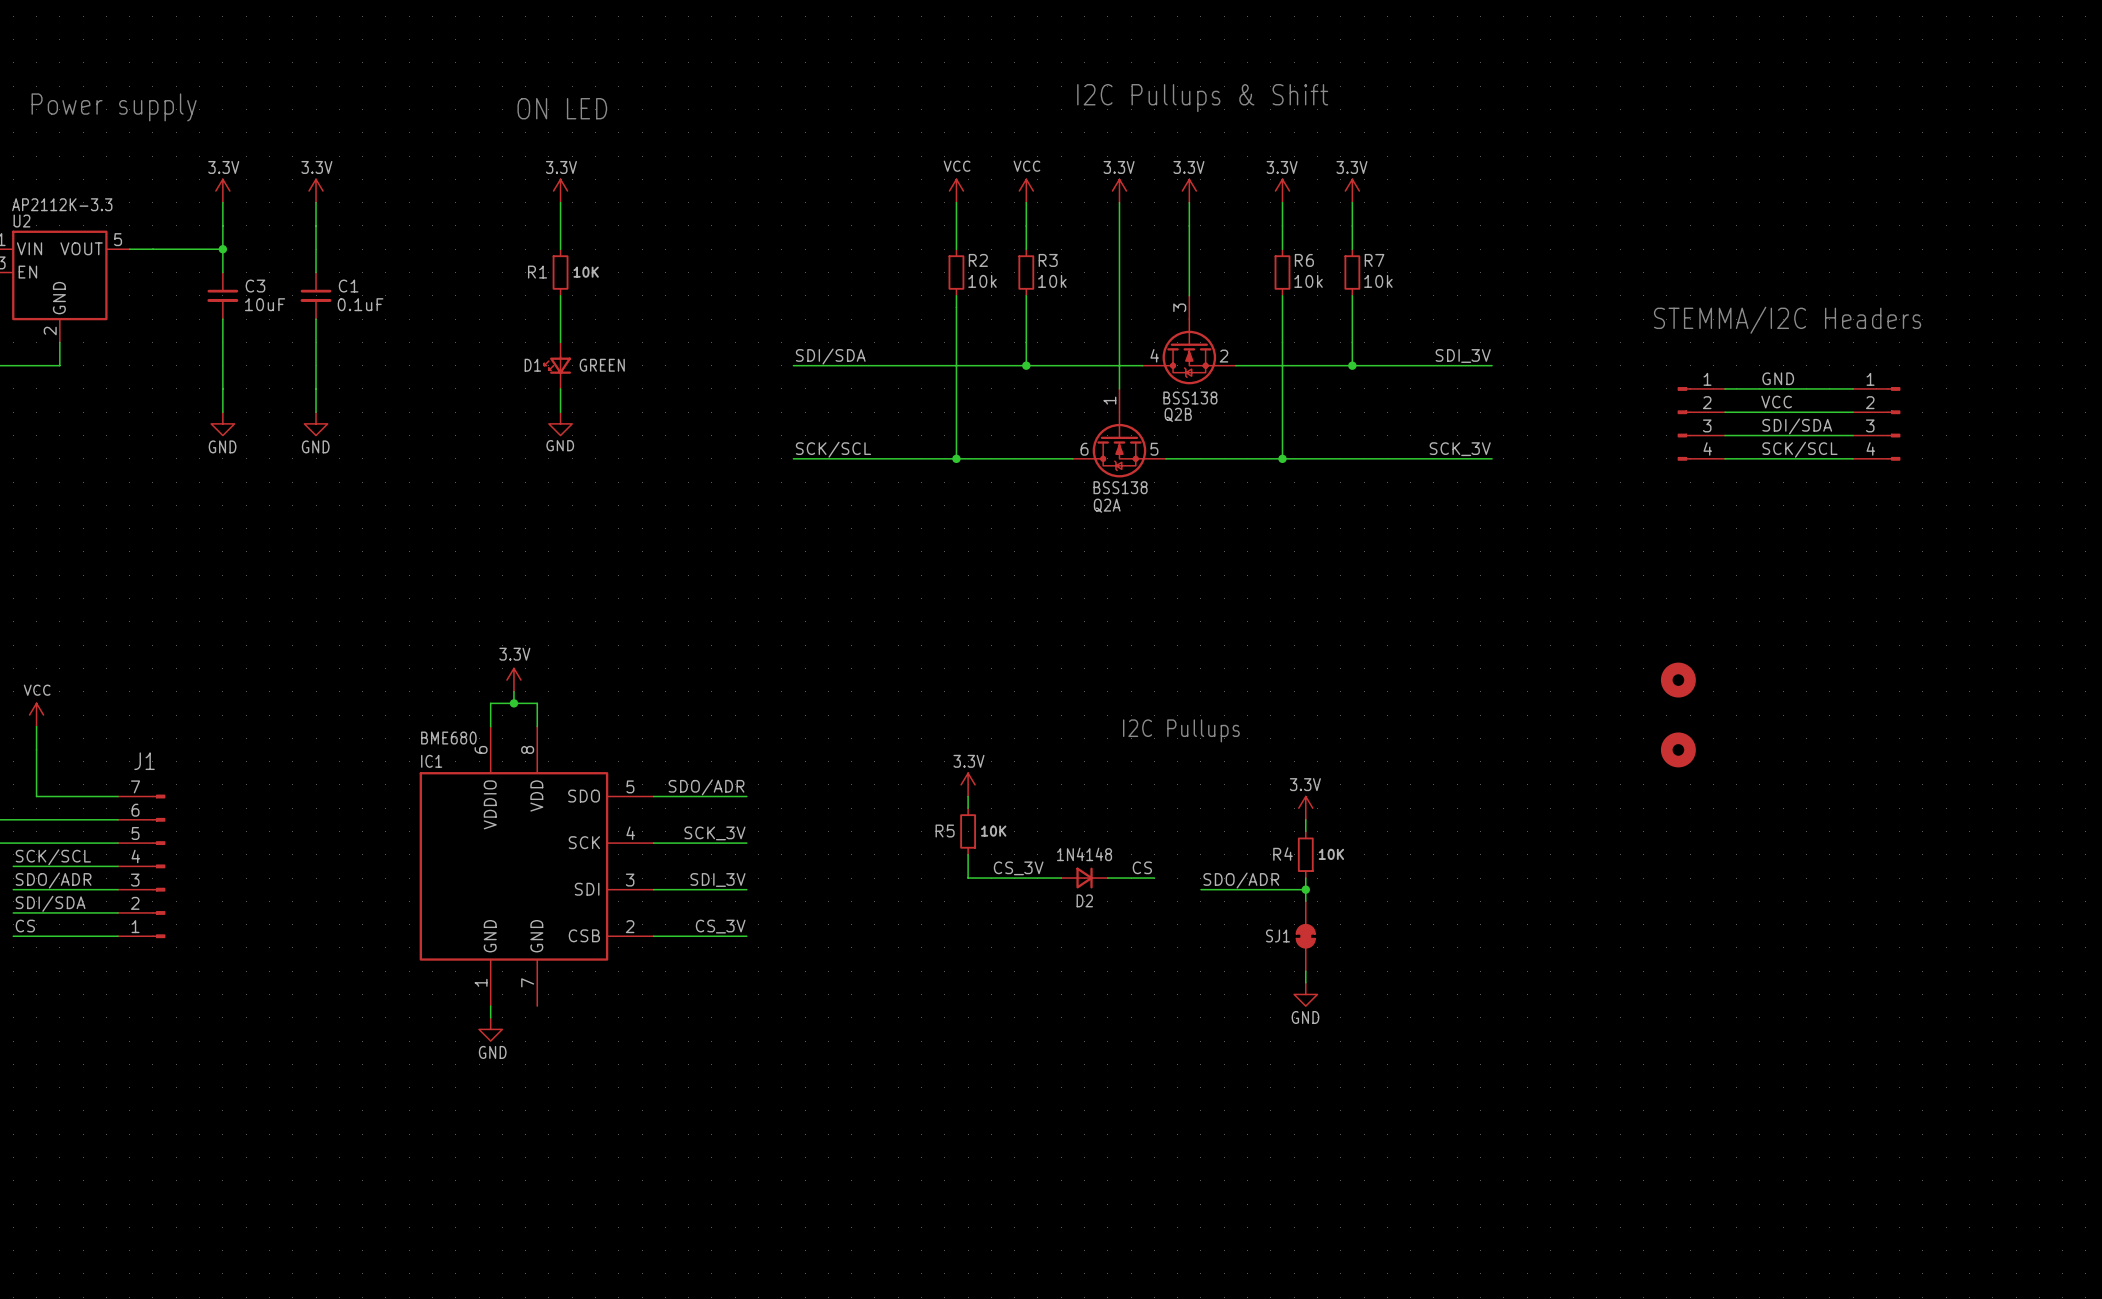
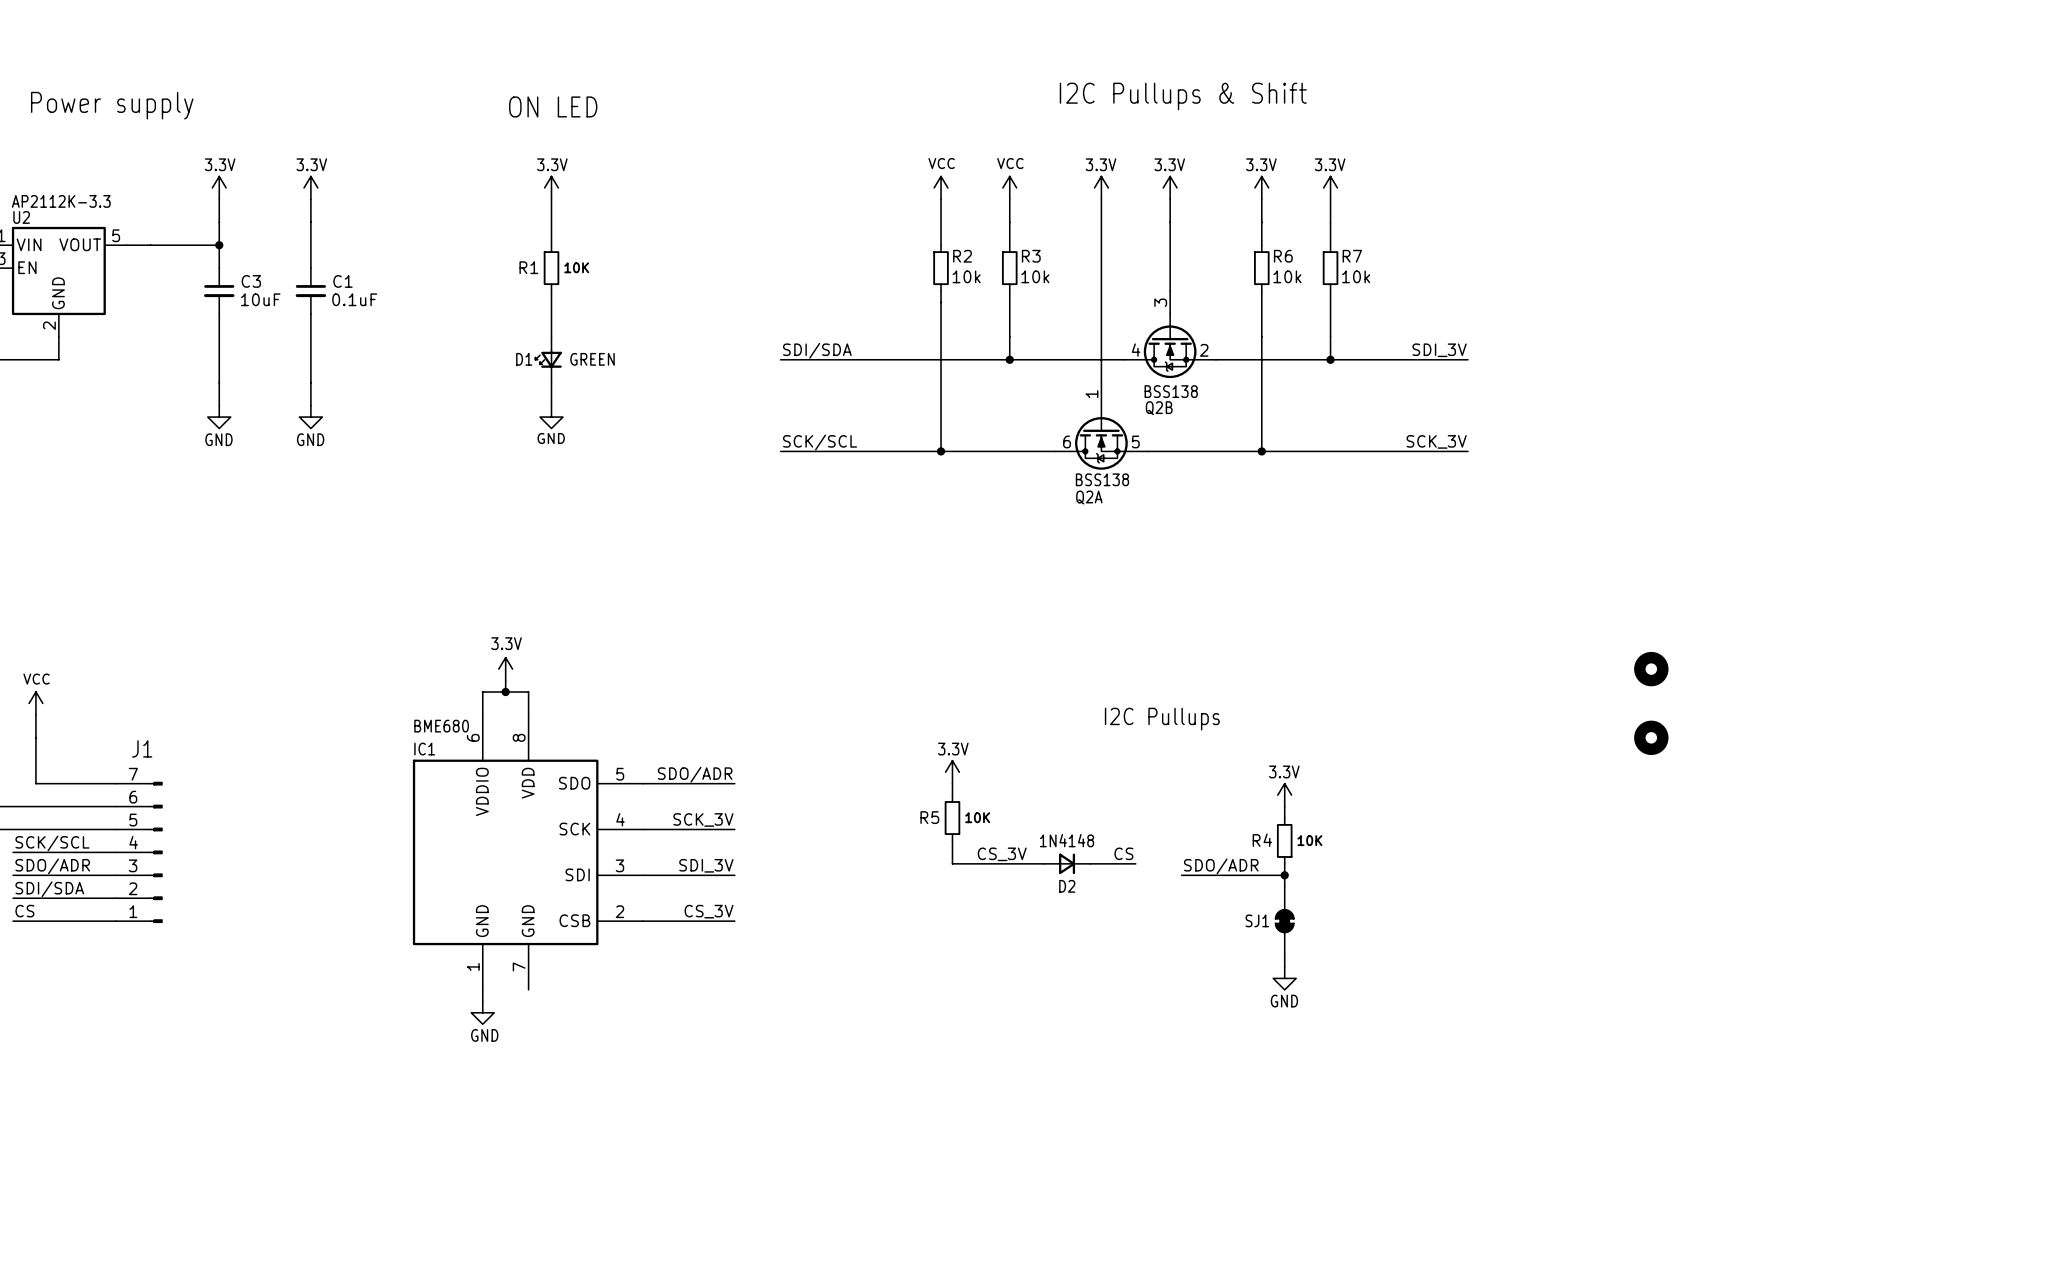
text: STEMMA/I2C Headers (1787, 320) -> none
label: GND (1778, 378) -> none
wire: (1724, 388) (1853, 388) -> none
label: VCC (1776, 402) -> none
wire: (1724, 412) (1853, 412) -> none
part: (1701, 423) -> none
part: (1876, 423) -> none
label: SDI/SDA (1797, 426) -> none
wire: (1724, 435) (1853, 435) -> none
label: SCK/SCL (1799, 449) -> none
wire: (1724, 458) (1853, 458) -> none

